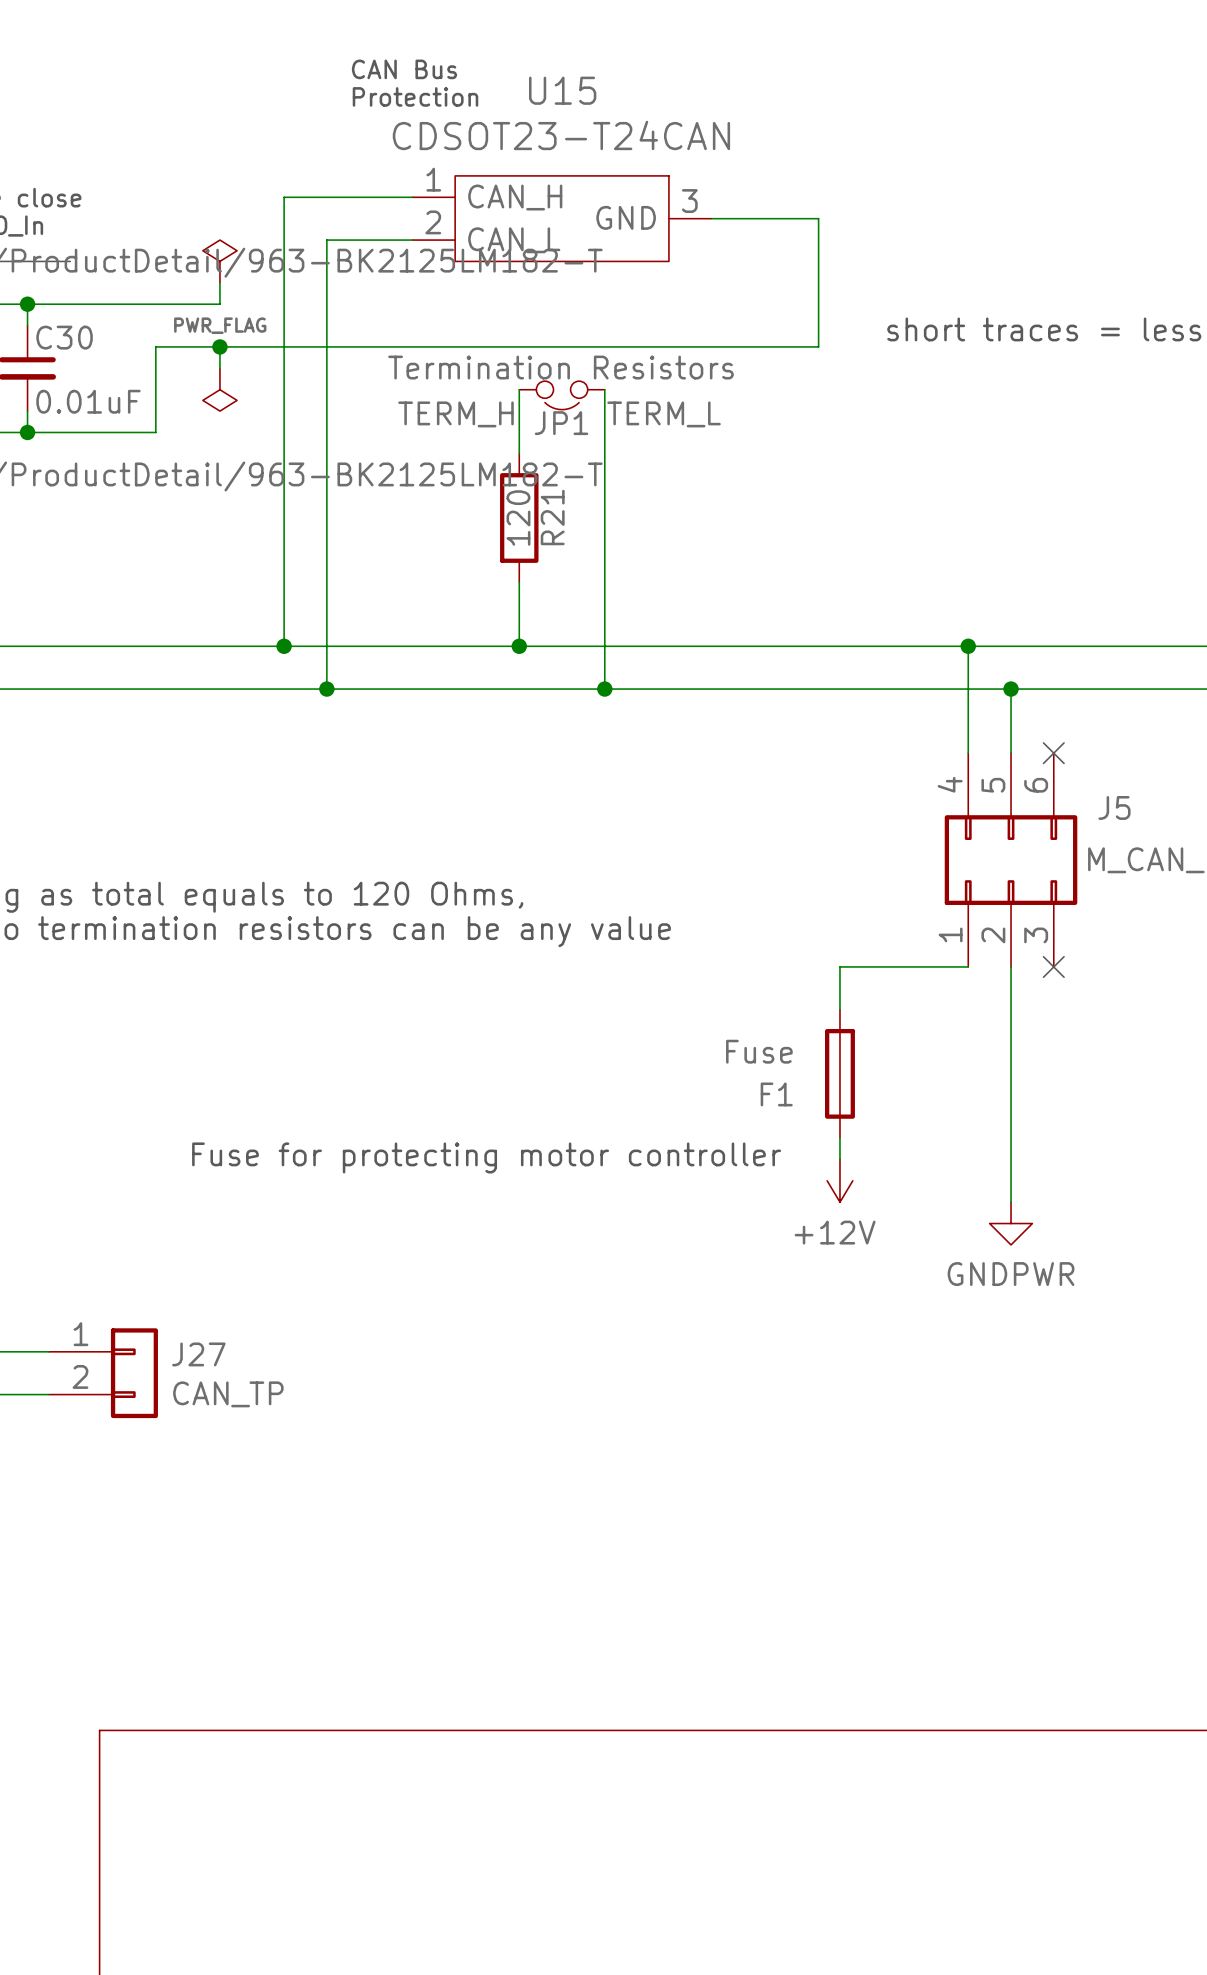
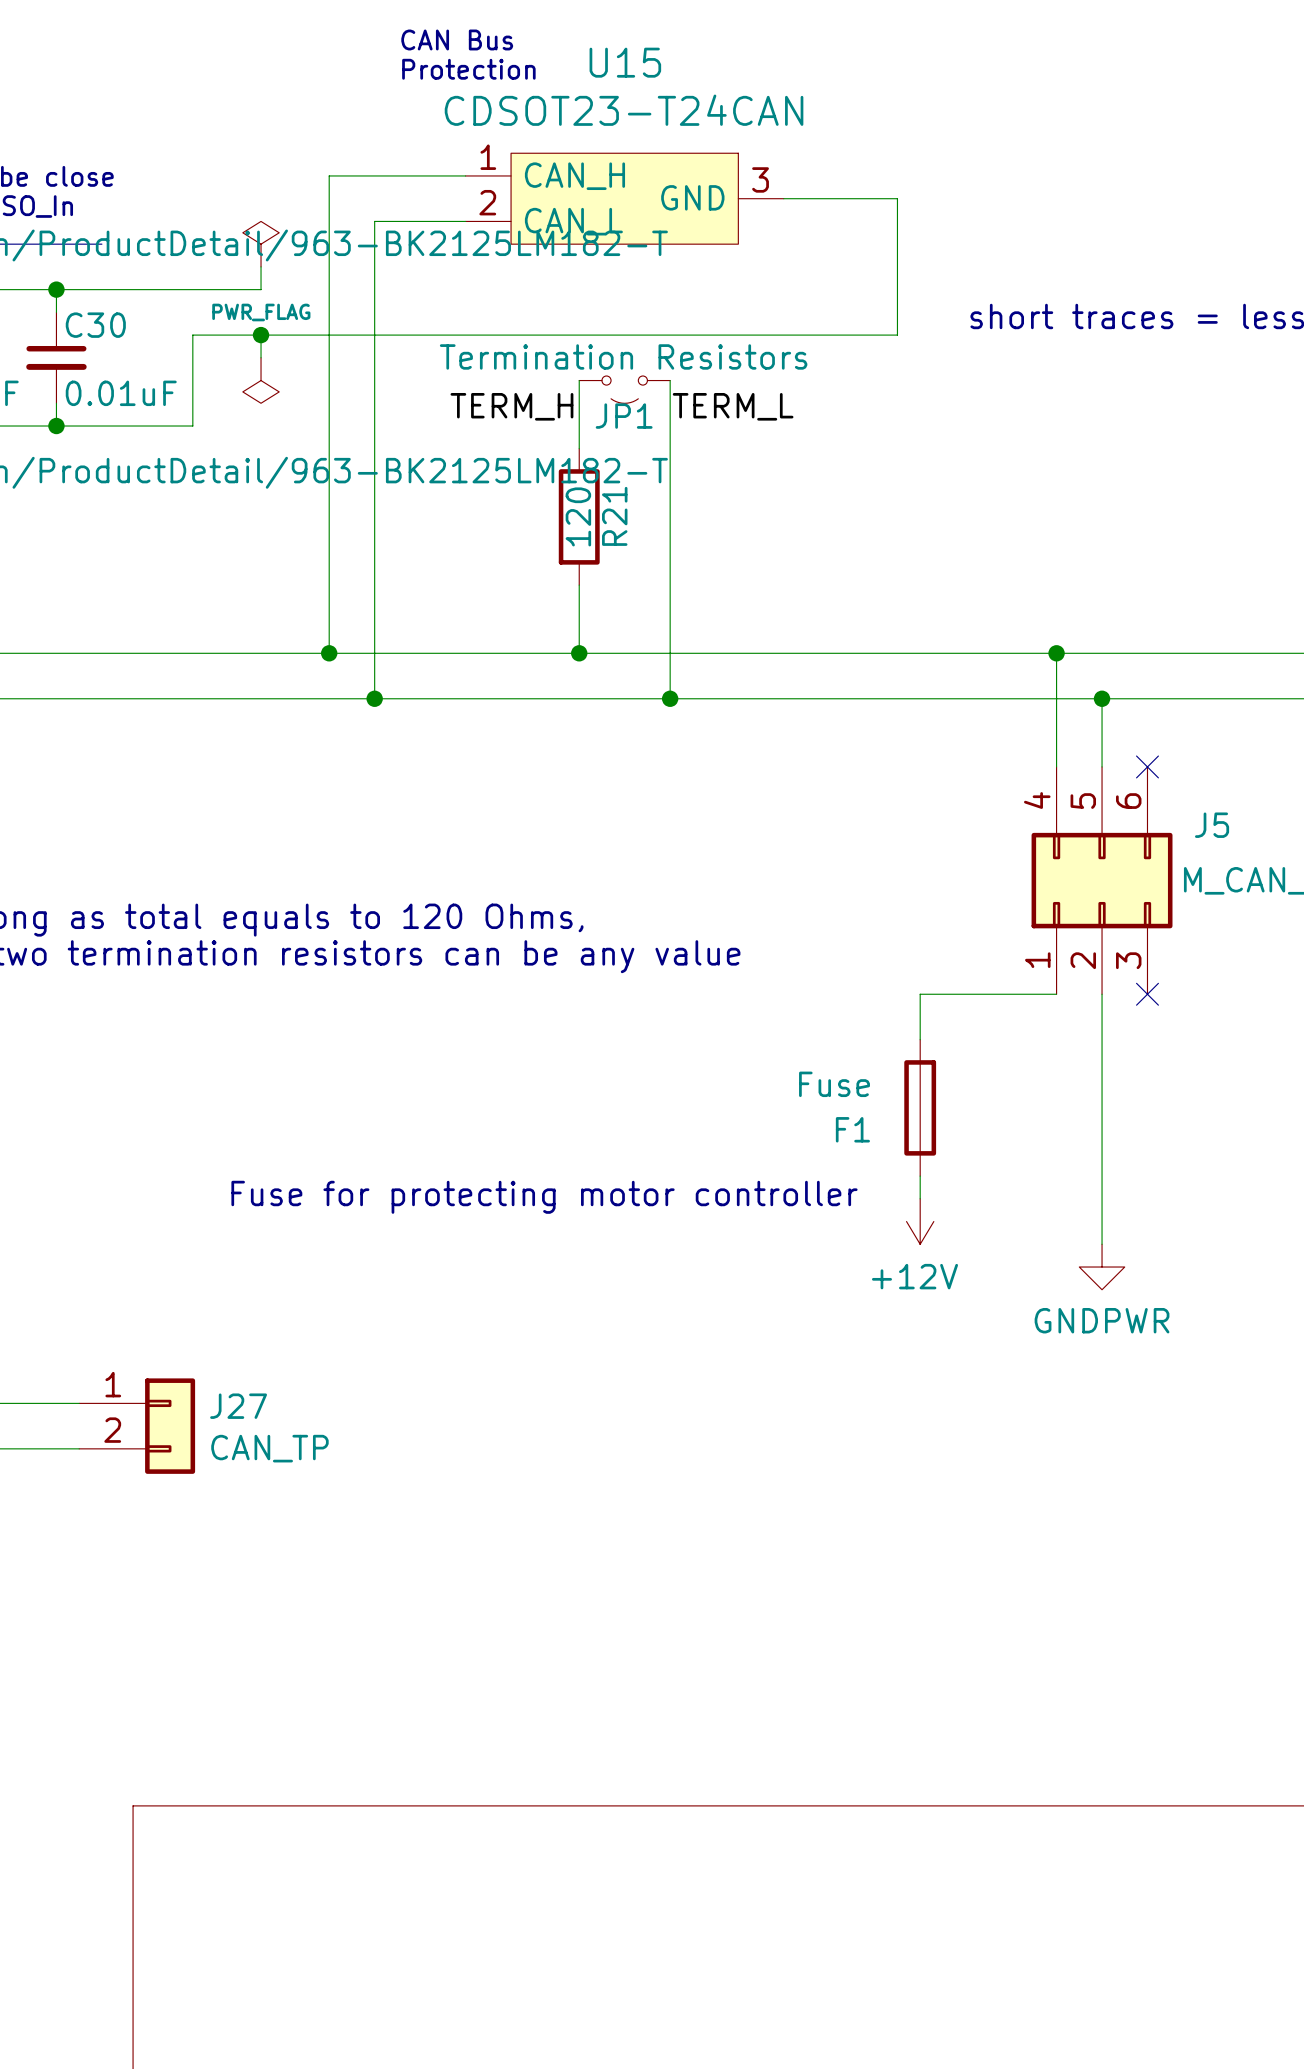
JP1 symbol: [519, 381, 605, 410] -> [579, 376, 671, 404]

